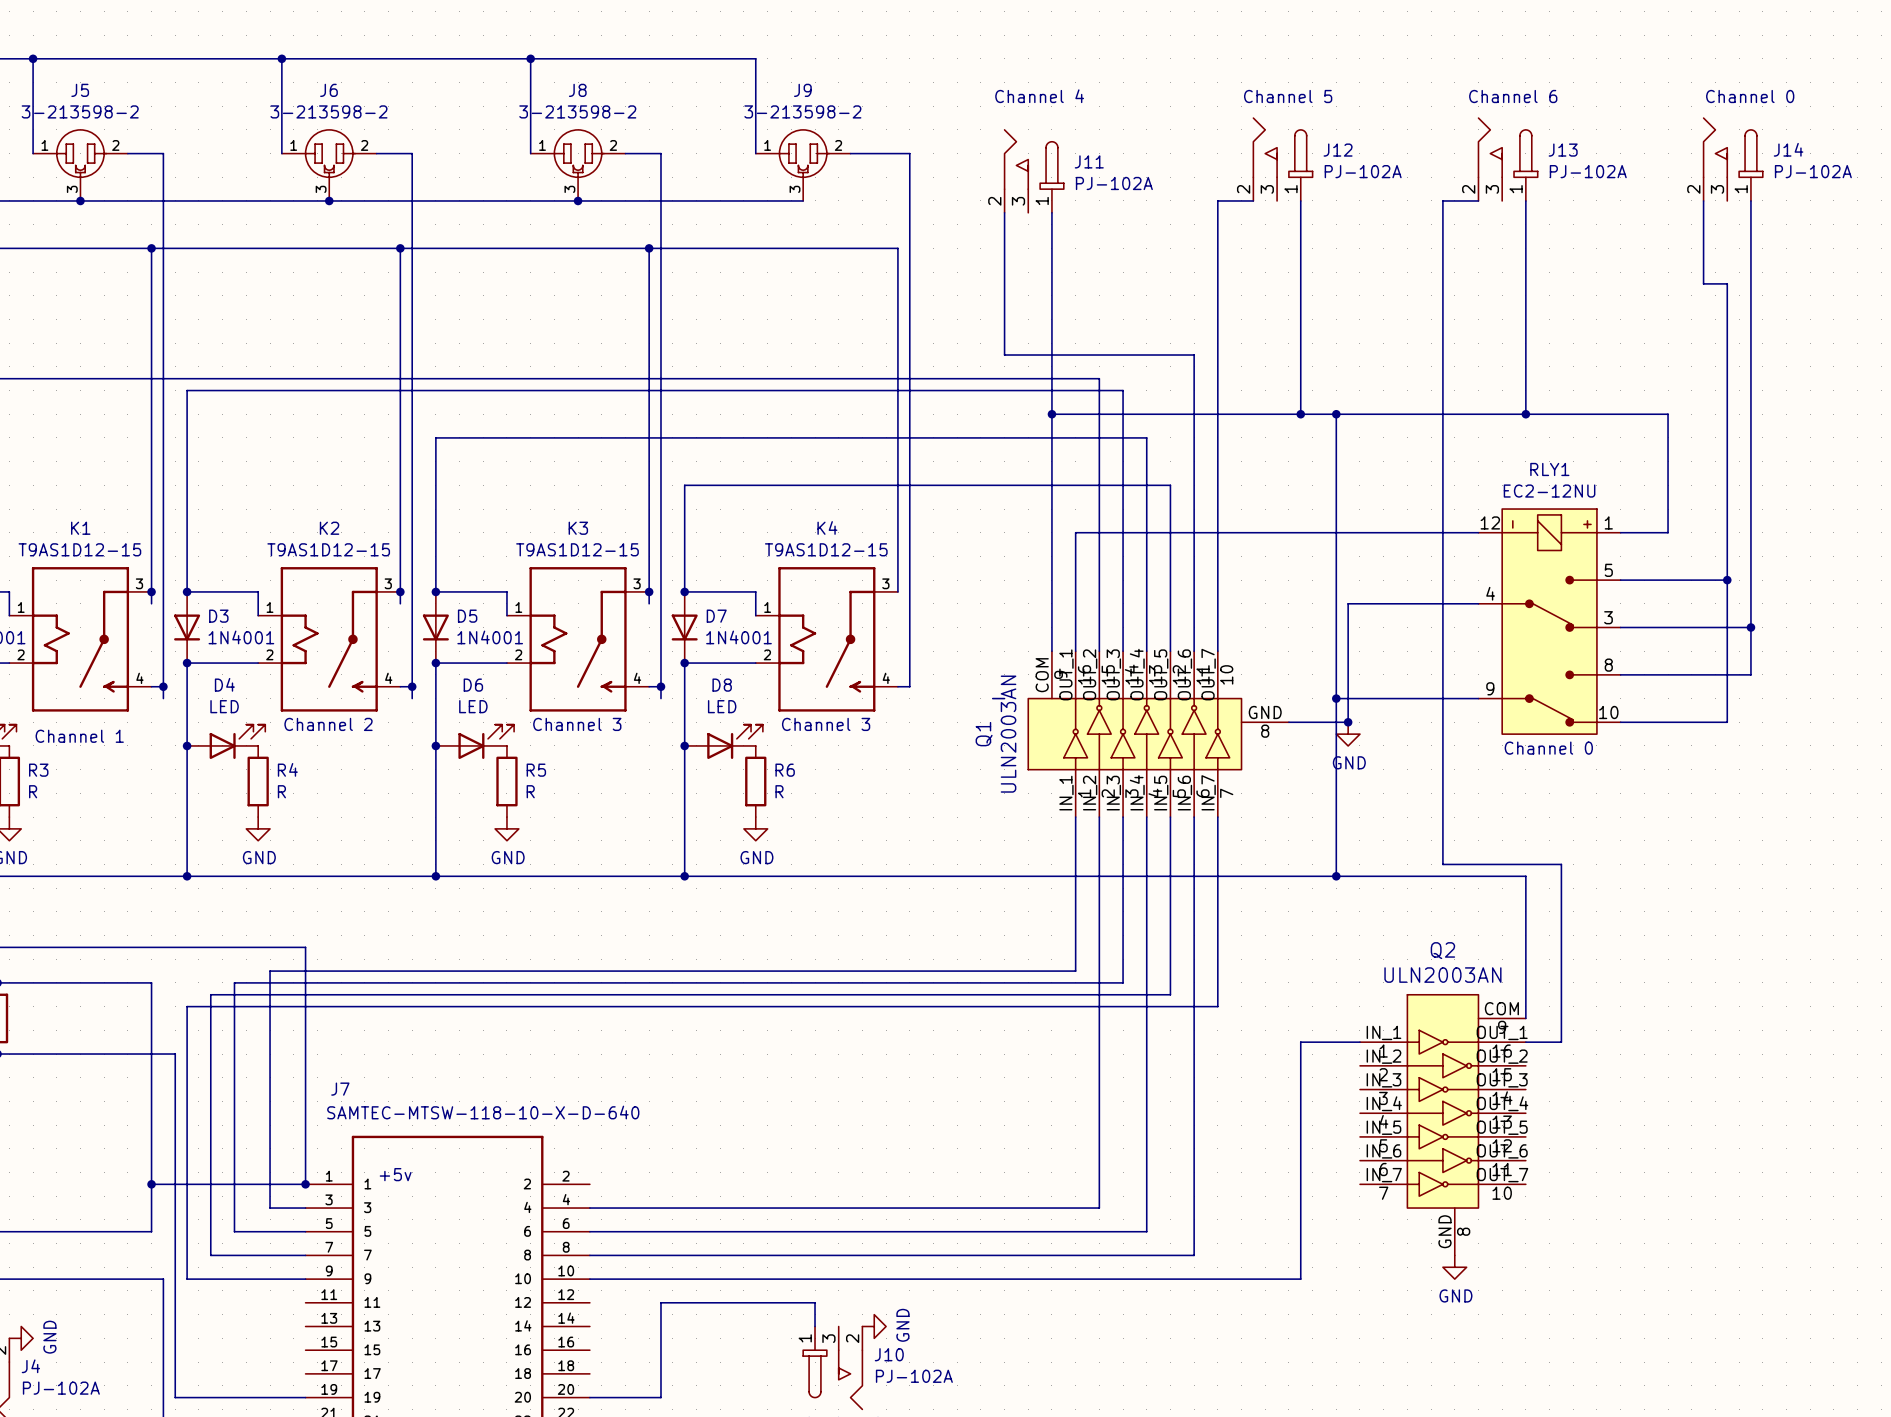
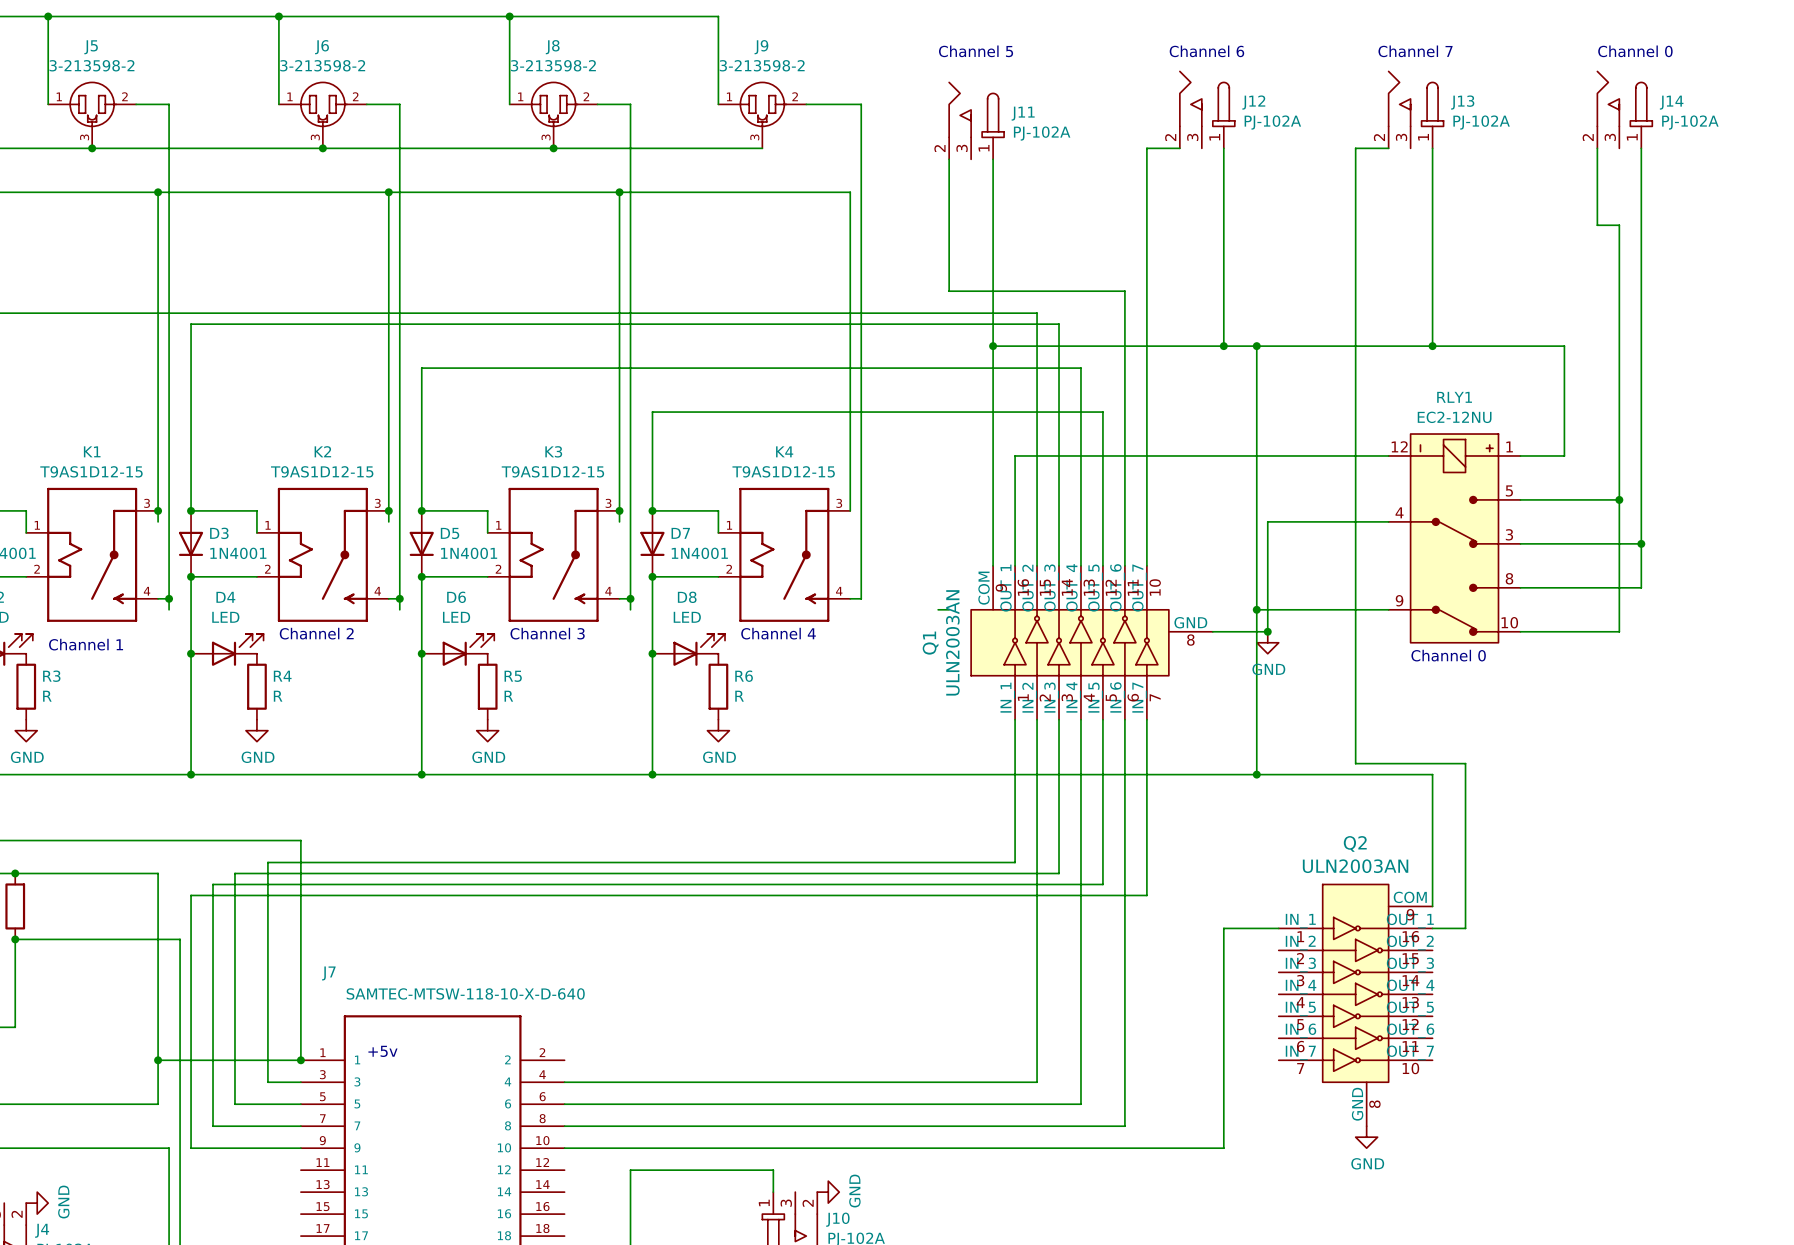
text: Channel 4 (1039, 96) -> Channel 5 (976, 51)
text: Channel 5 (1288, 96) -> Channel 6 (1206, 51)
text: Channel 6 (1513, 96) -> Channel 7 (1415, 51)
text: Channel 3 (826, 724) -> Channel 4 (778, 633)

